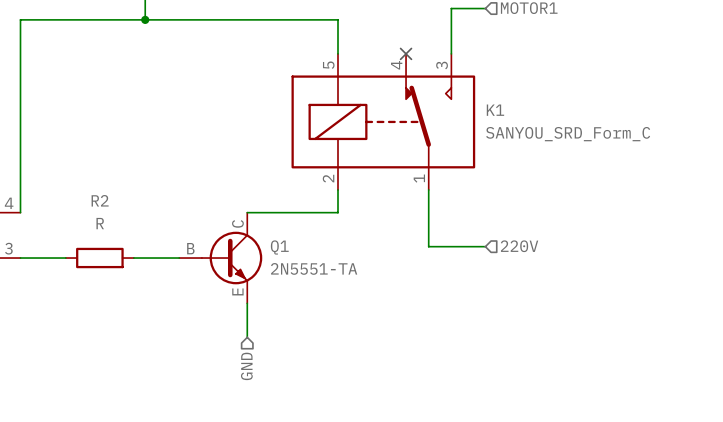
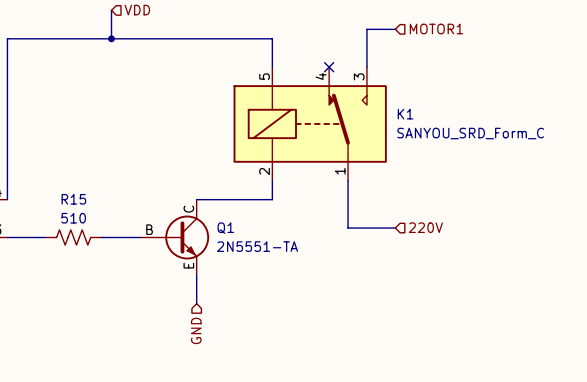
R2: R (99, 258) -> none
R15: none -> 510 (73, 237)

